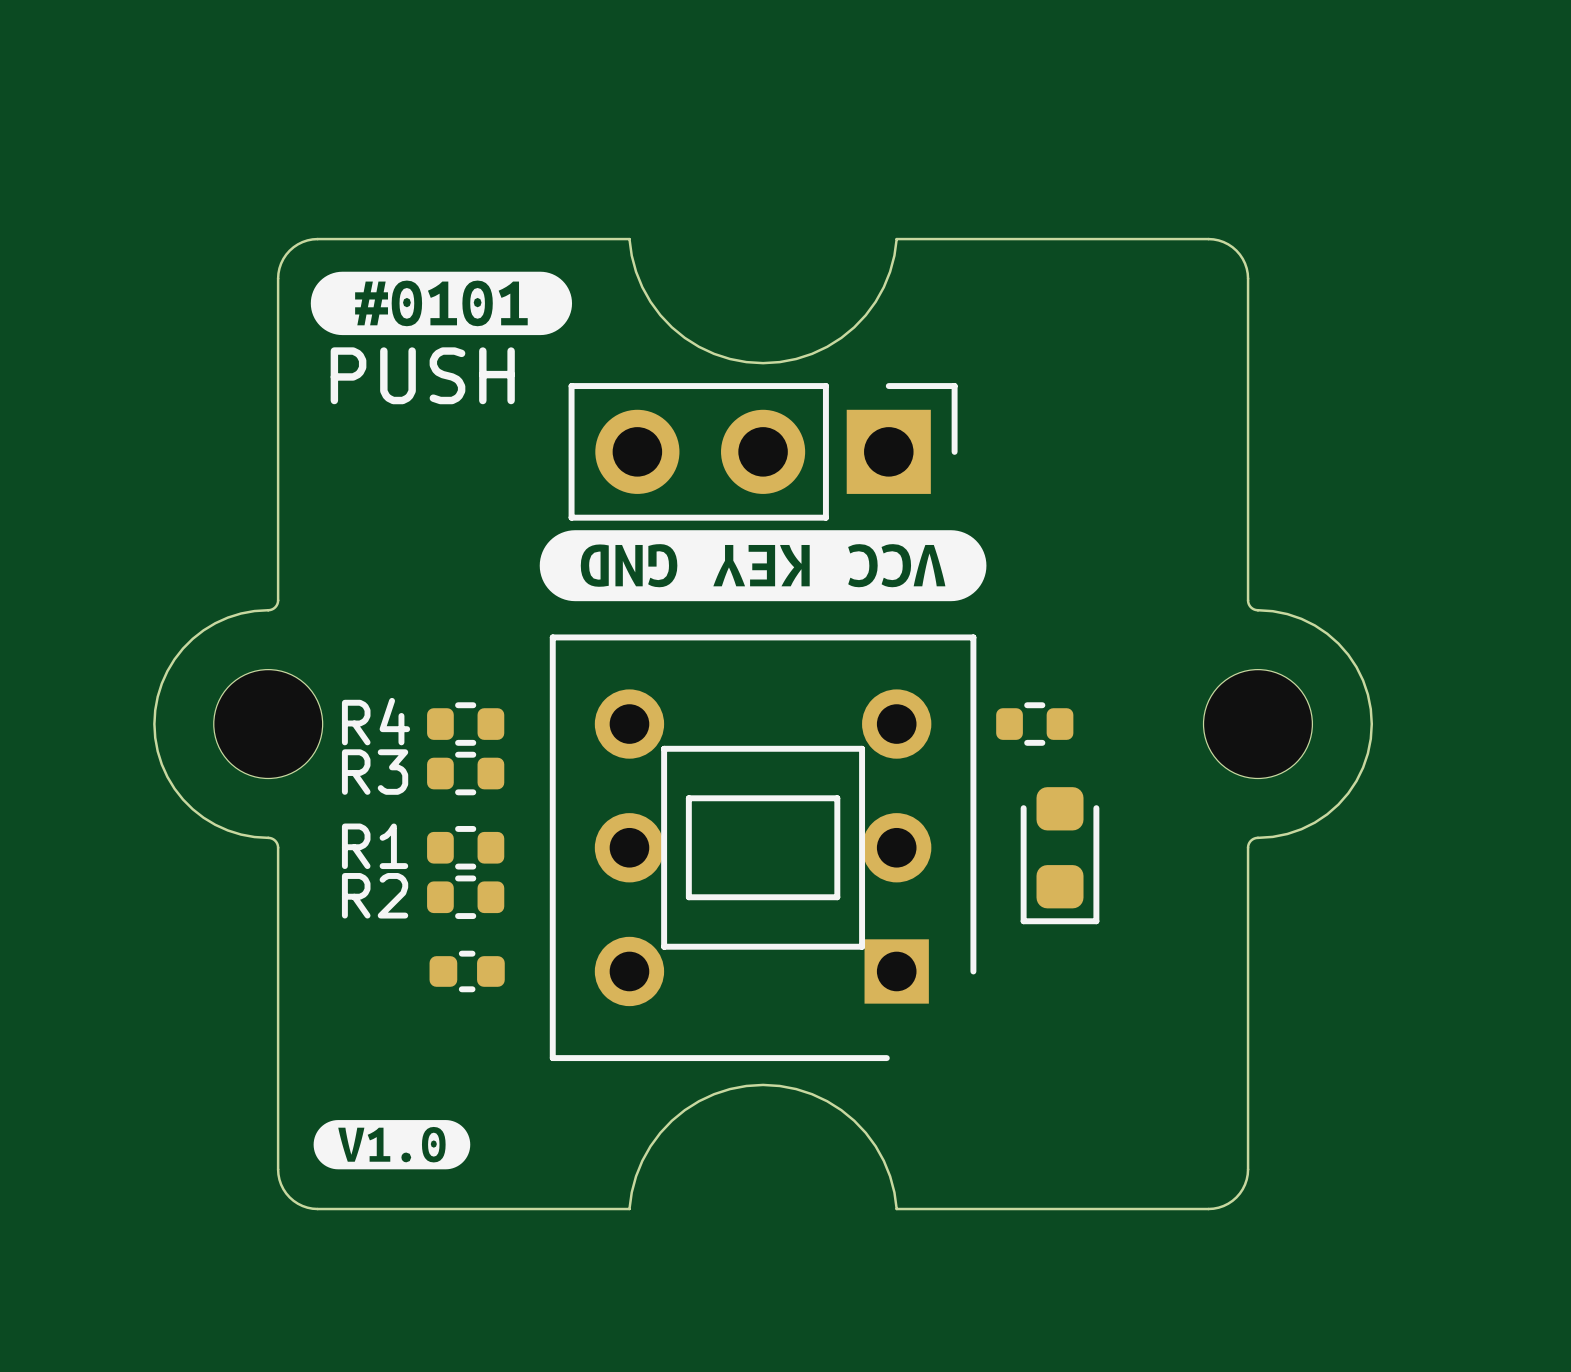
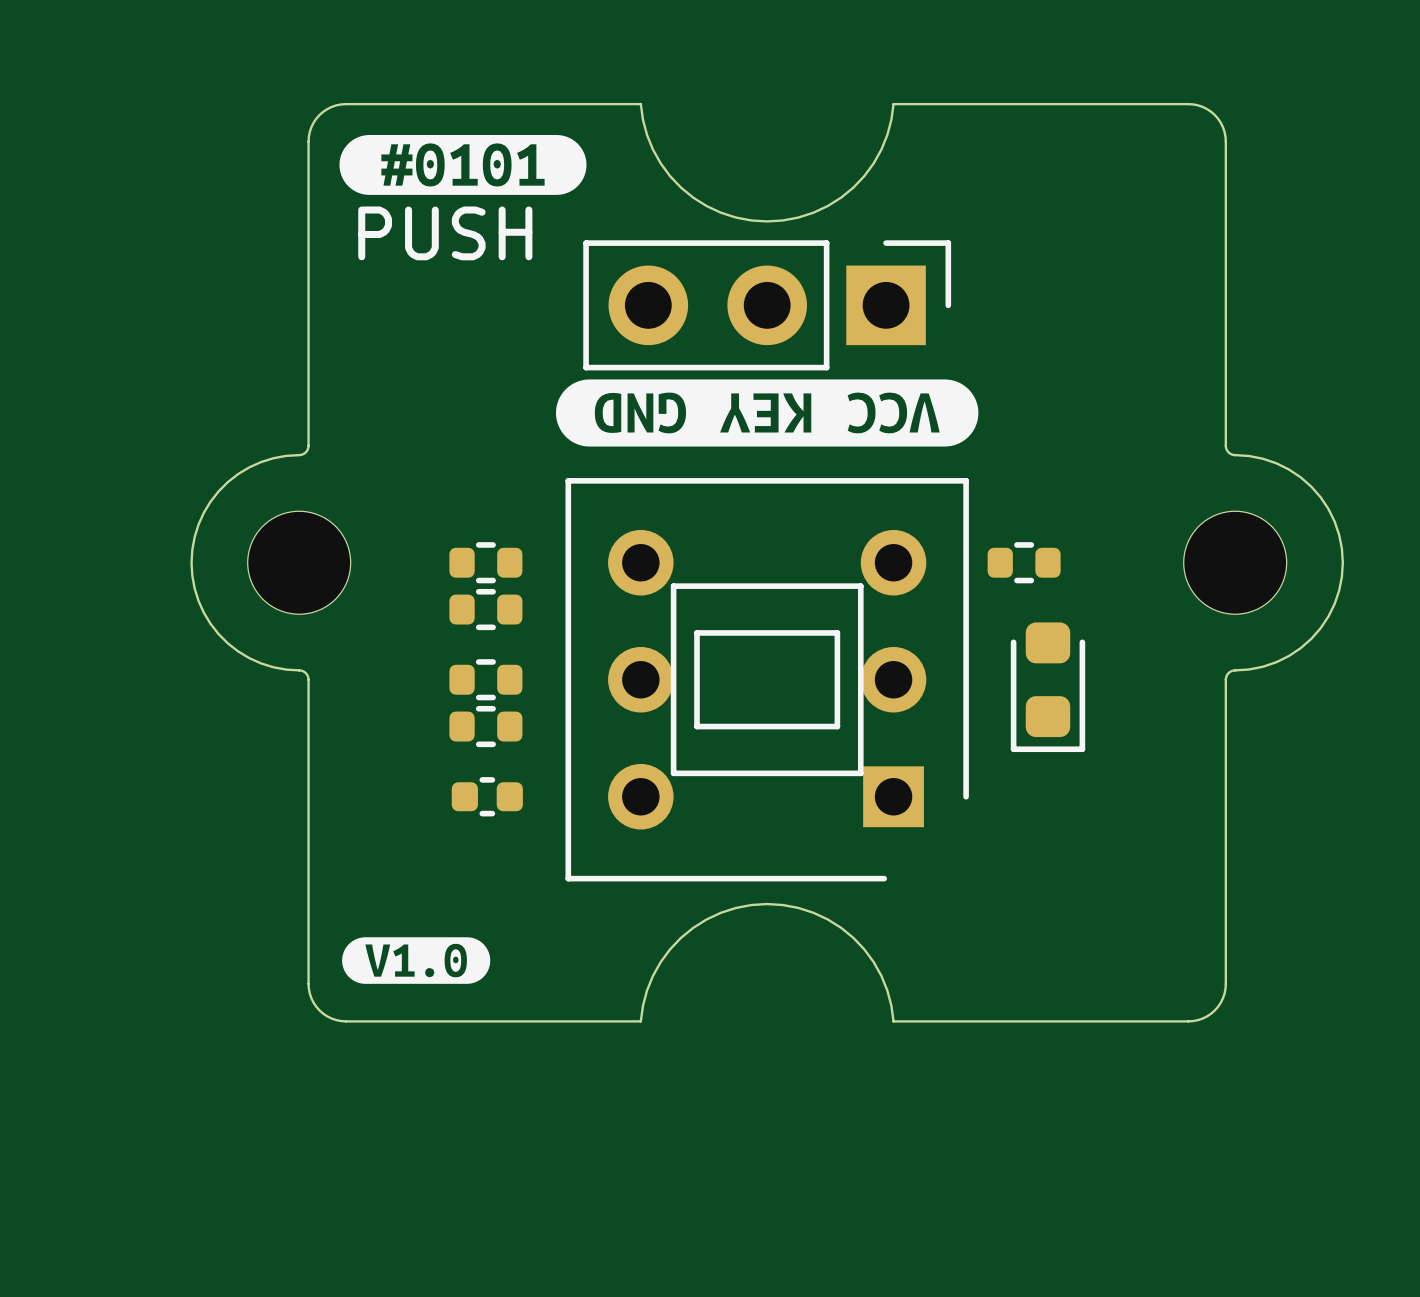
R4 name: R4 (376, 721) -> none
R3 name: R3 (375, 772) -> none
R1 name: R1 (375, 846) -> none
R2 name: R2 (375, 895) -> none

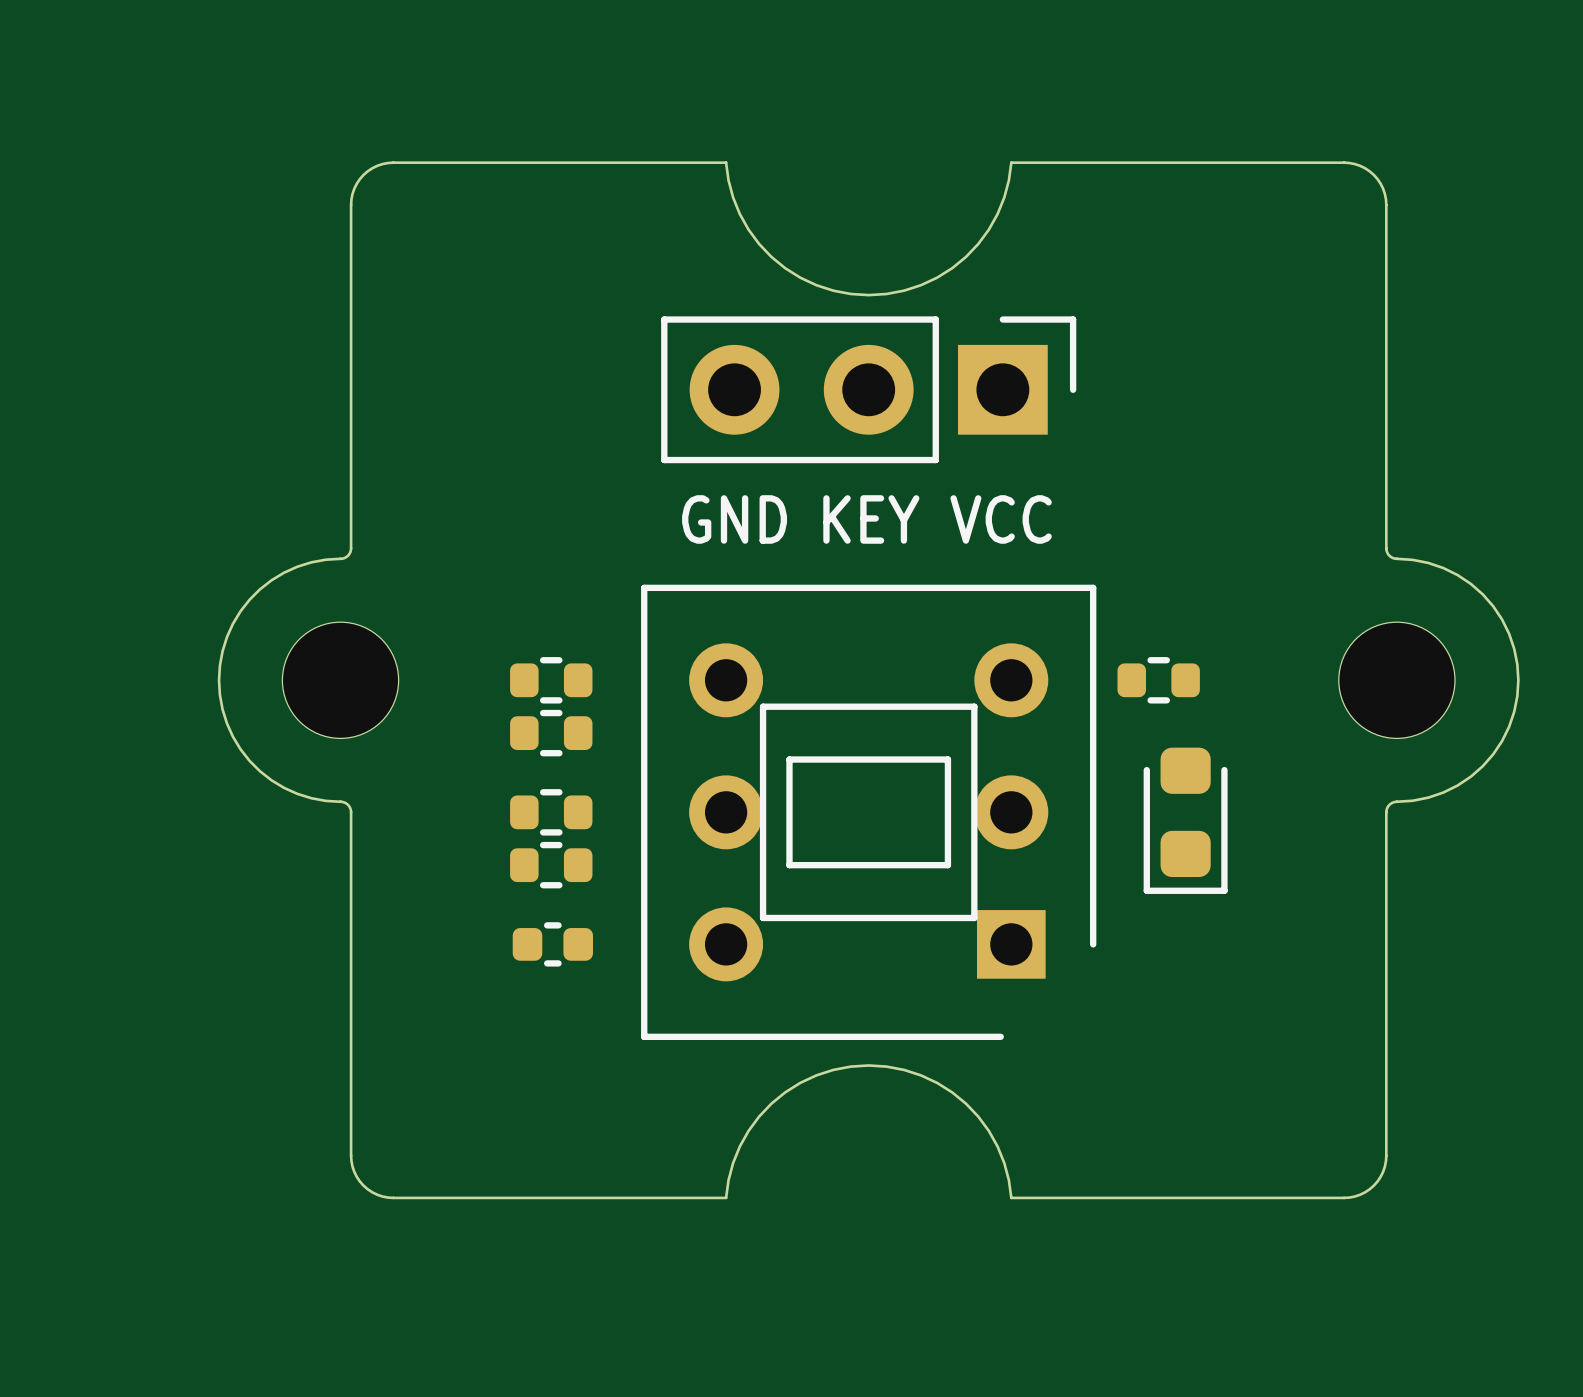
drawing: [339, 134, 587, 195] -> none
text: PUSH (445, 233) -> none
drawing: [555, 379, 979, 447] -> none
text: none -> GND (734, 519)
text: none -> KEY (871, 519)
text: none -> VCC (1001, 519)
drawing: [342, 937, 491, 984] -> none

